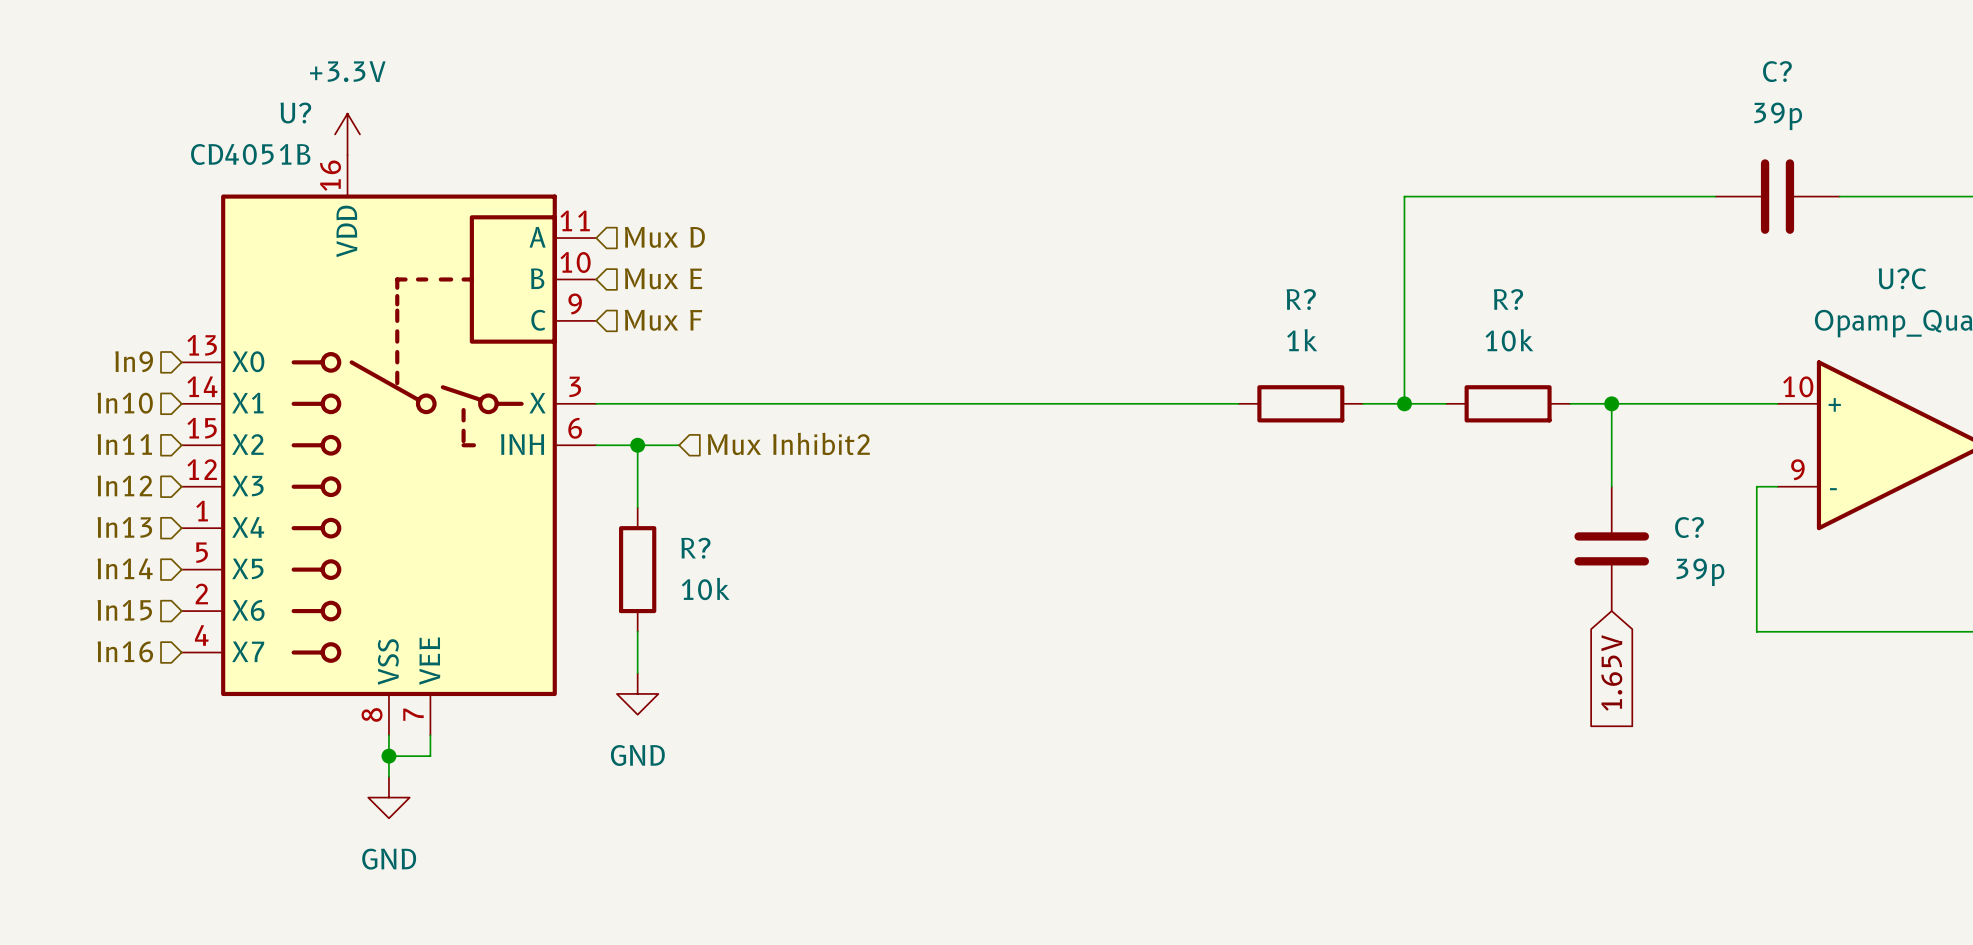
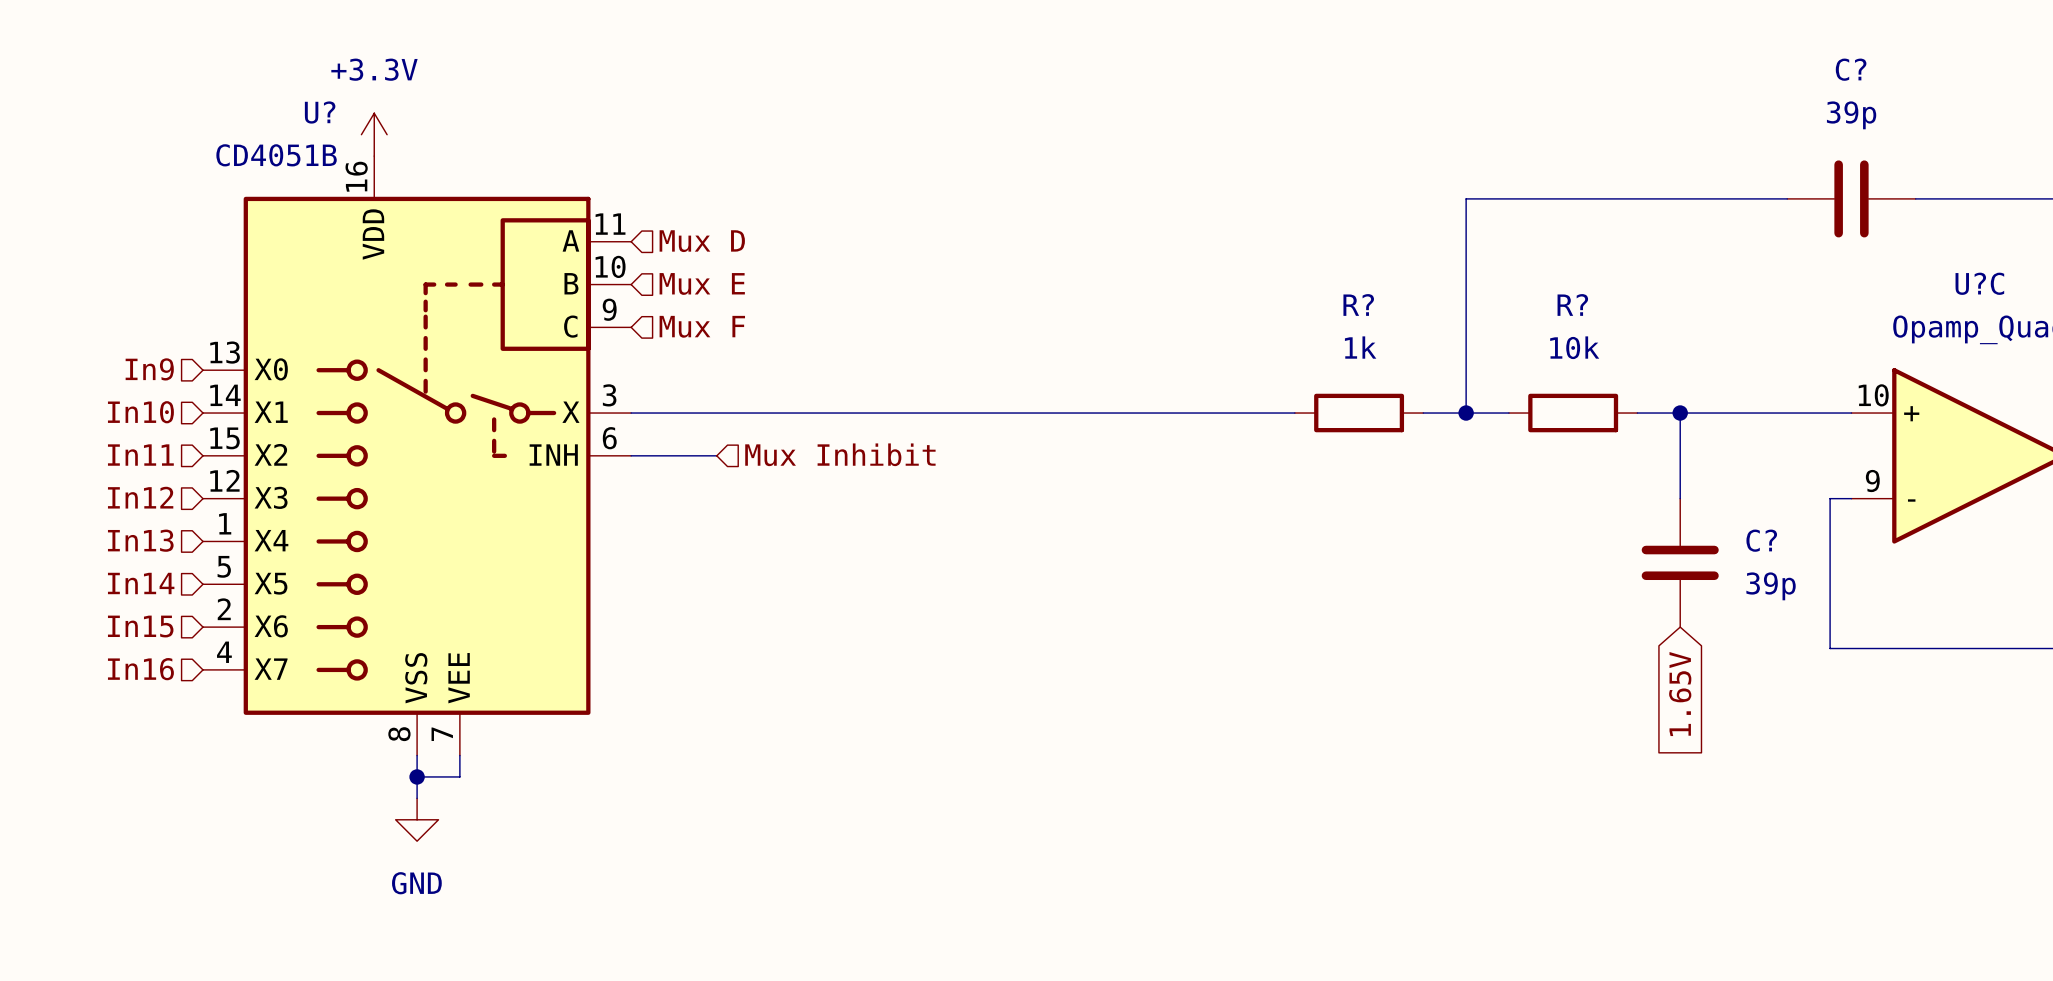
hierarchical label: Mux Inhibit2 (788, 443) -> Mux Inhibit (840, 454)
wire: (637, 445) (637, 507) -> none
junction: (637, 445) -> none
R?: 10k (637, 569) -> none
wire: (637, 631) (637, 673) -> none
power symbol: GND (637, 693) -> none

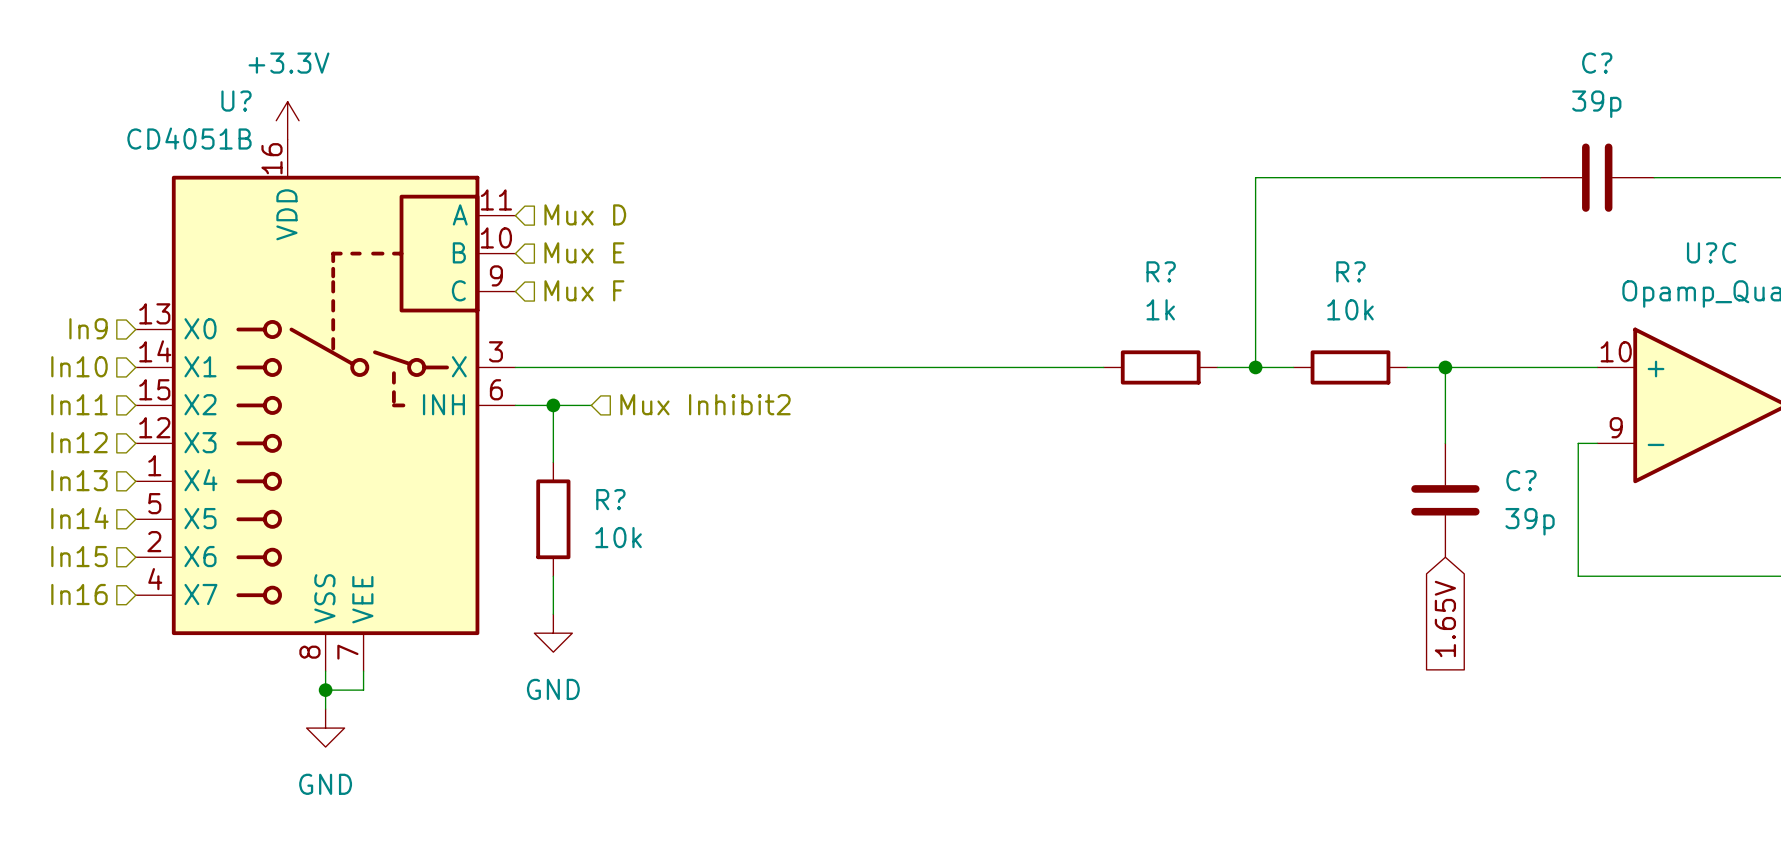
hierarchical label: Mux Inhibit (840, 454) -> Mux Inhibit2 (705, 404)
wire: none -> (553, 405) (553, 462)
junction: none -> (553, 405)
R?: none -> 10k (553, 519)
wire: none -> (553, 576) (553, 614)
power symbol: none -> GND (553, 633)

